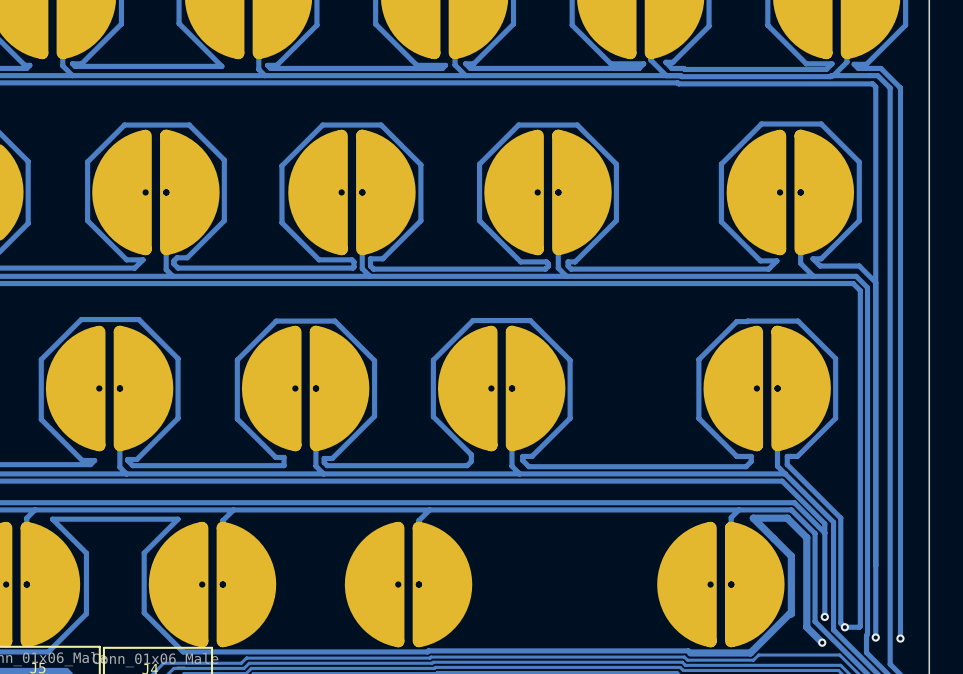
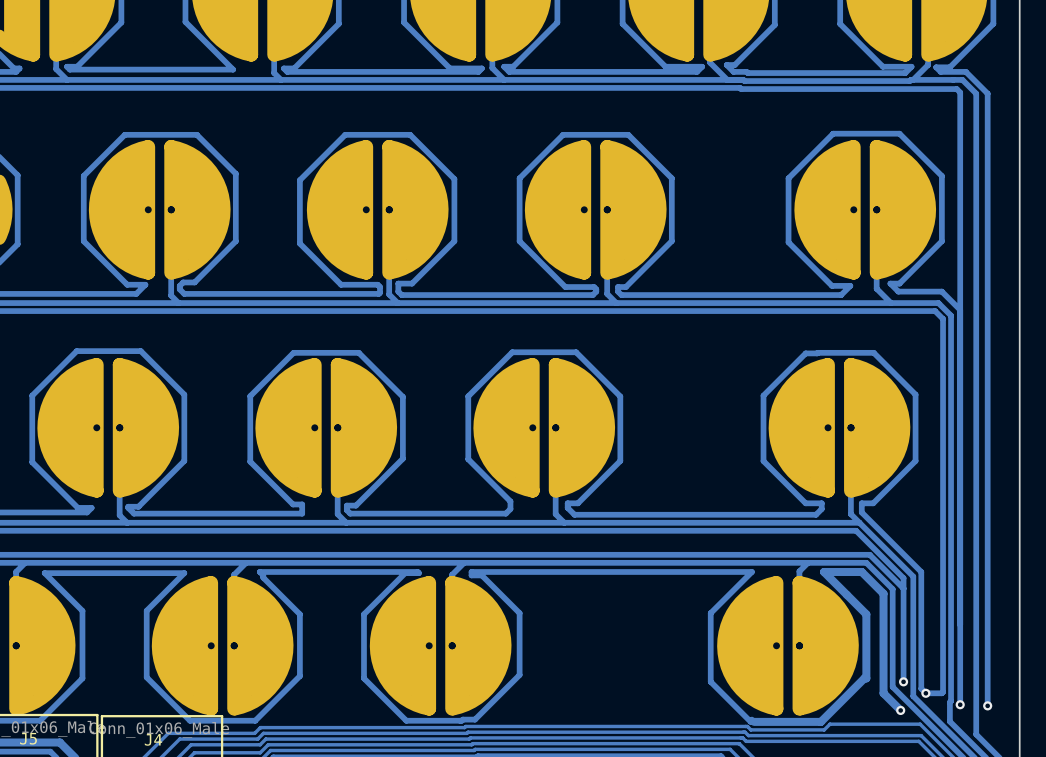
track: (688, 650) (439, 650) -> (754, 721) (750, 721) (710, 681) (710, 613) (751, 571) (471, 571) (471, 575) (481, 575) (519, 613) (519, 674) (474, 719)
track: (377, 651) (241, 651) -> (406, 720) (363, 678) (363, 614) (405, 573) (418, 573) (417, 571) (259, 571) (299, 614) (299, 676) (255, 720)

